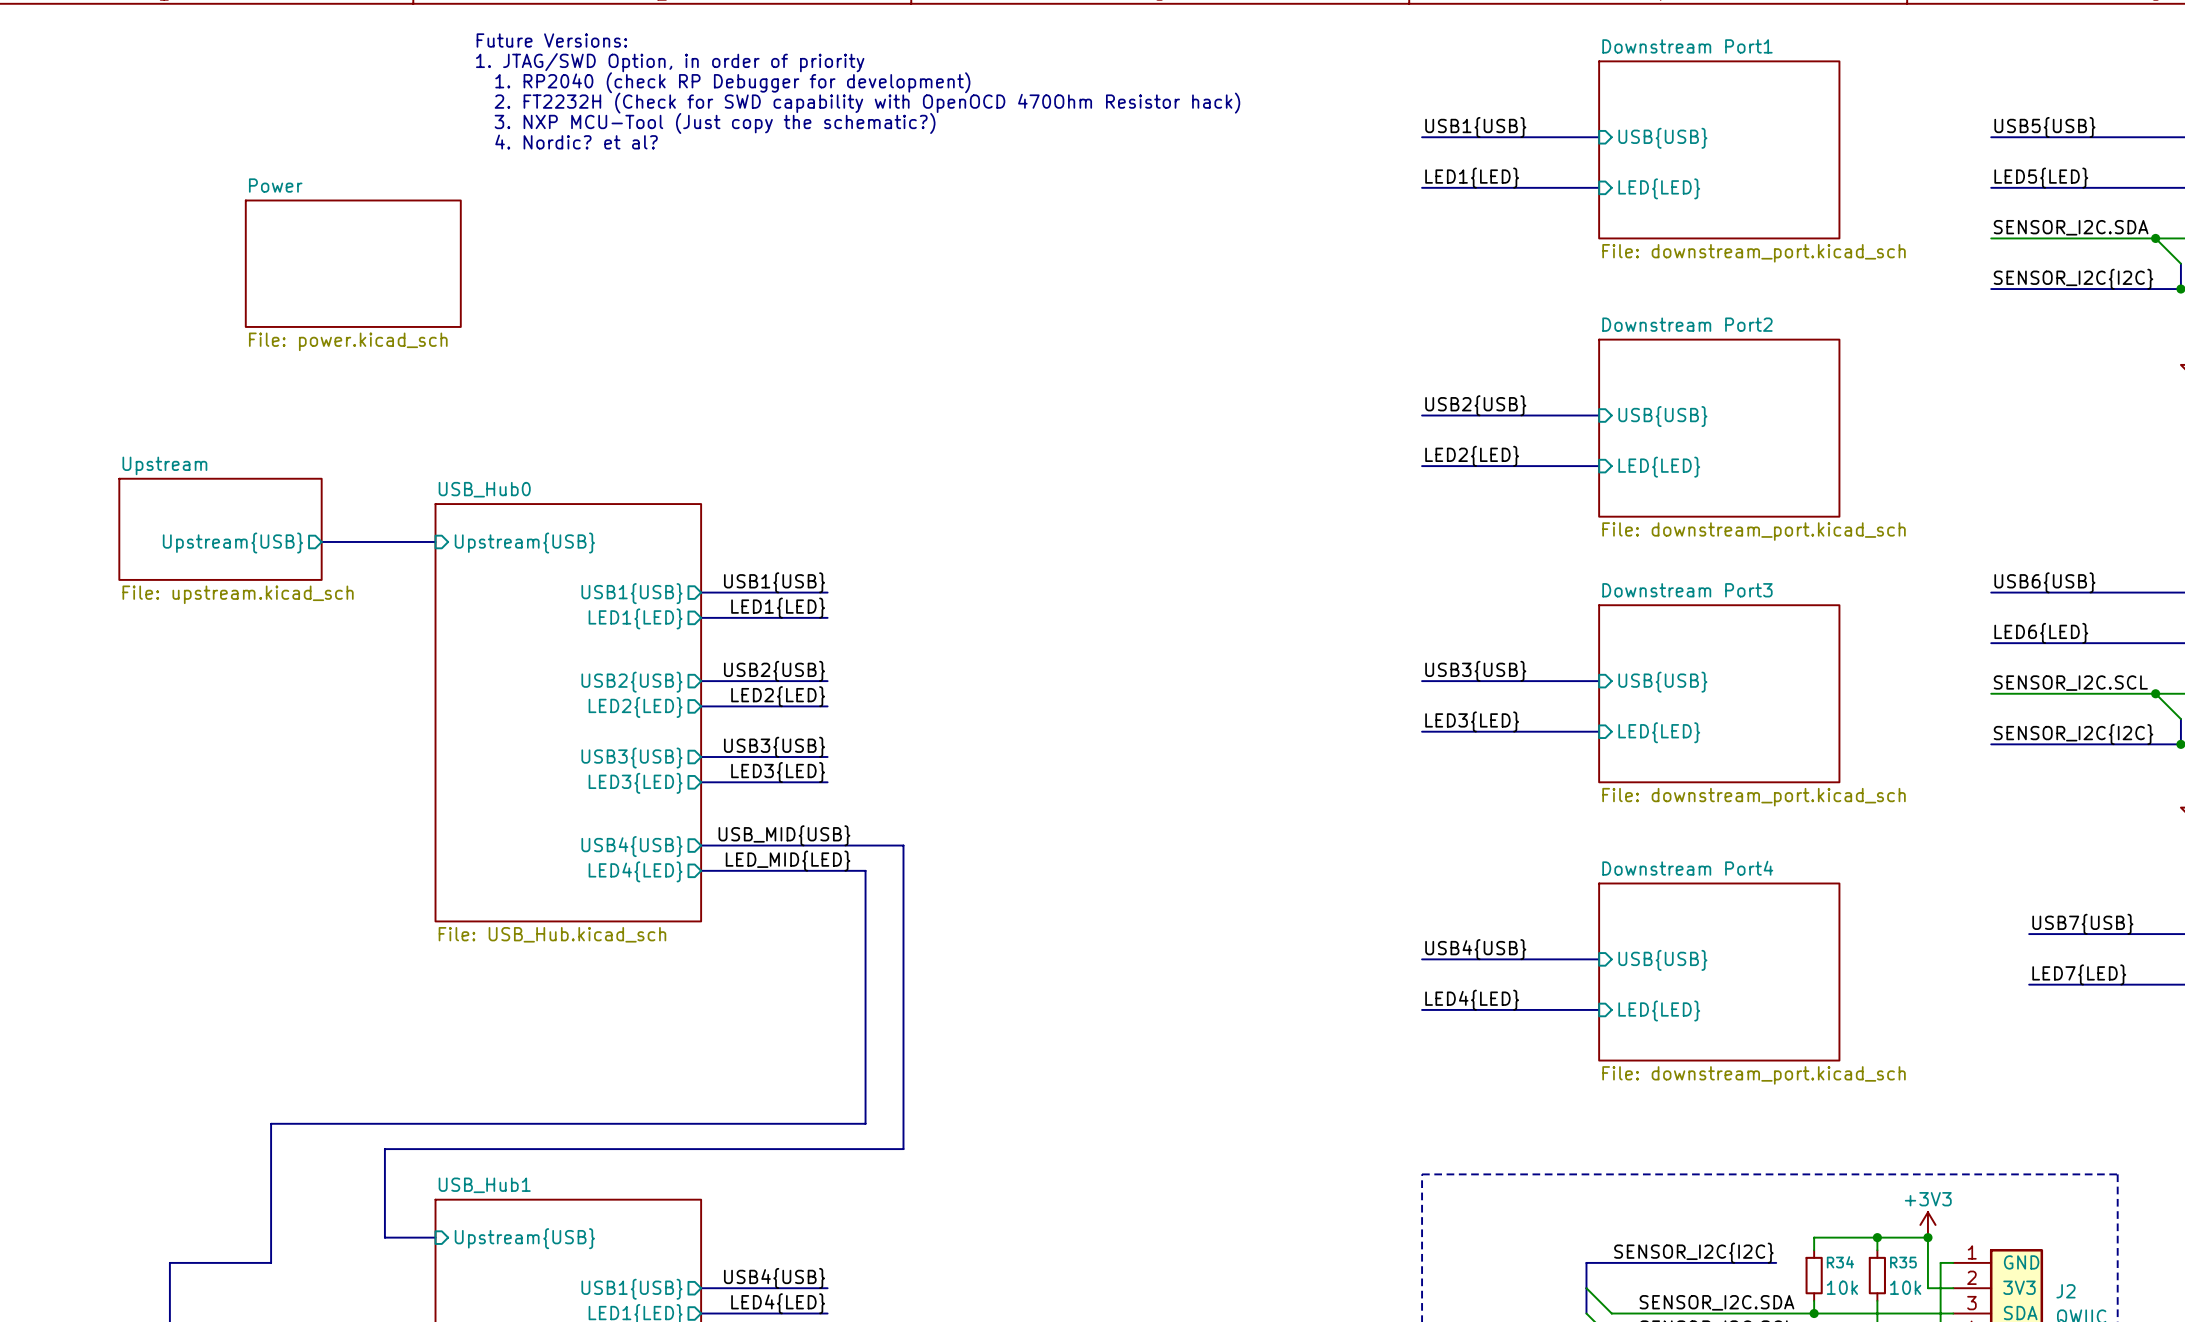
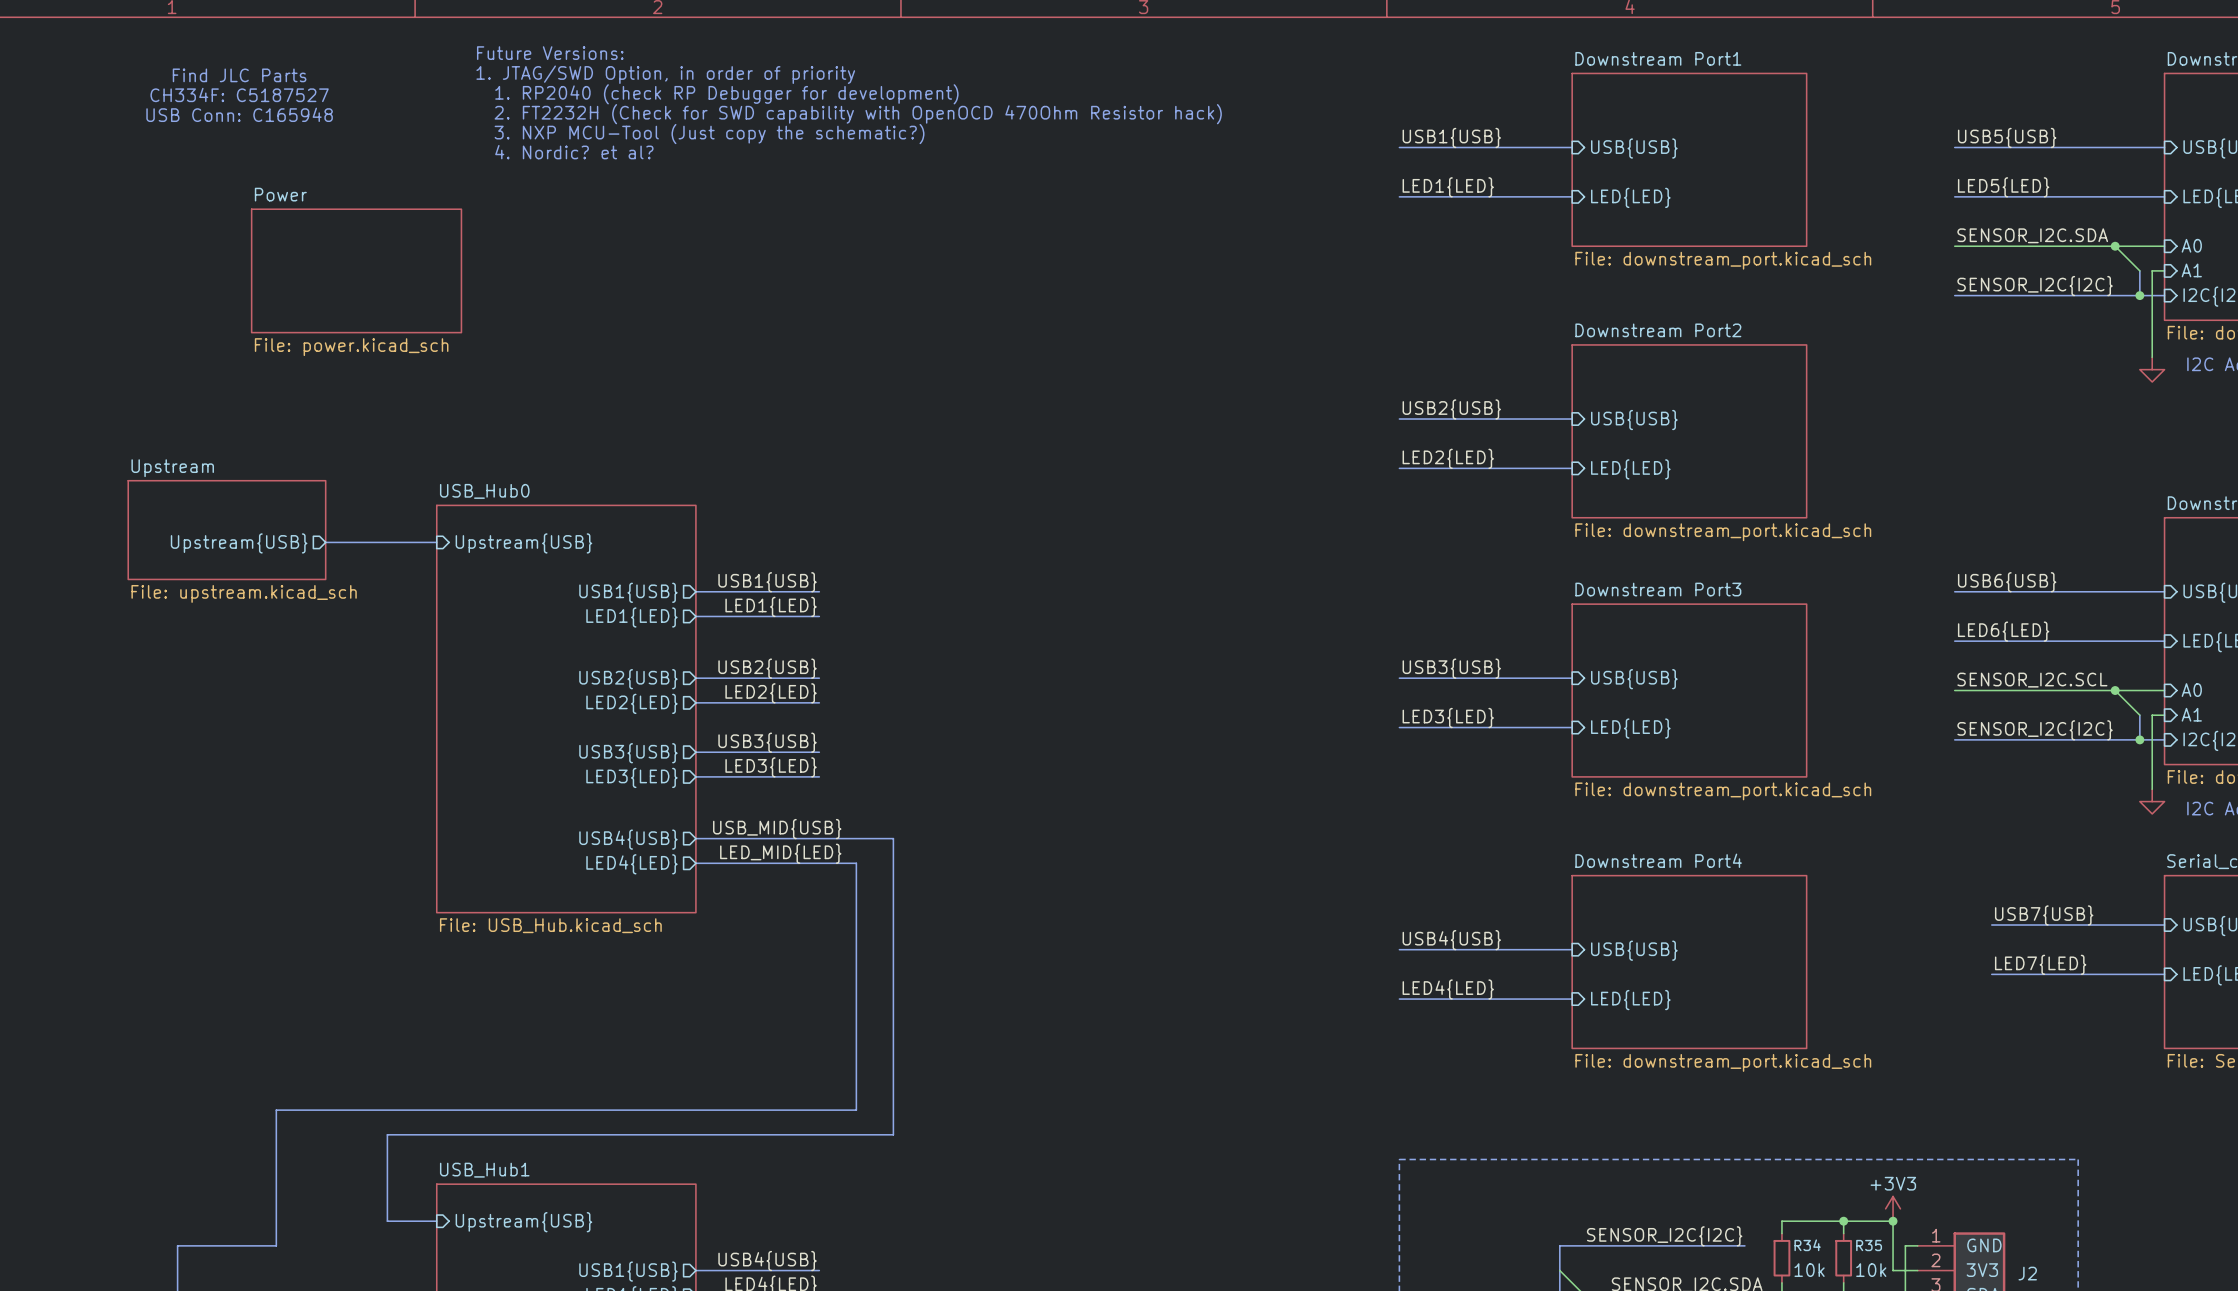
text: none -> Find JLC Parts (239, 75)
text: none -> CH334F: C5187527 (239, 94)
text: none -> USB Conn: C165948 (239, 114)

